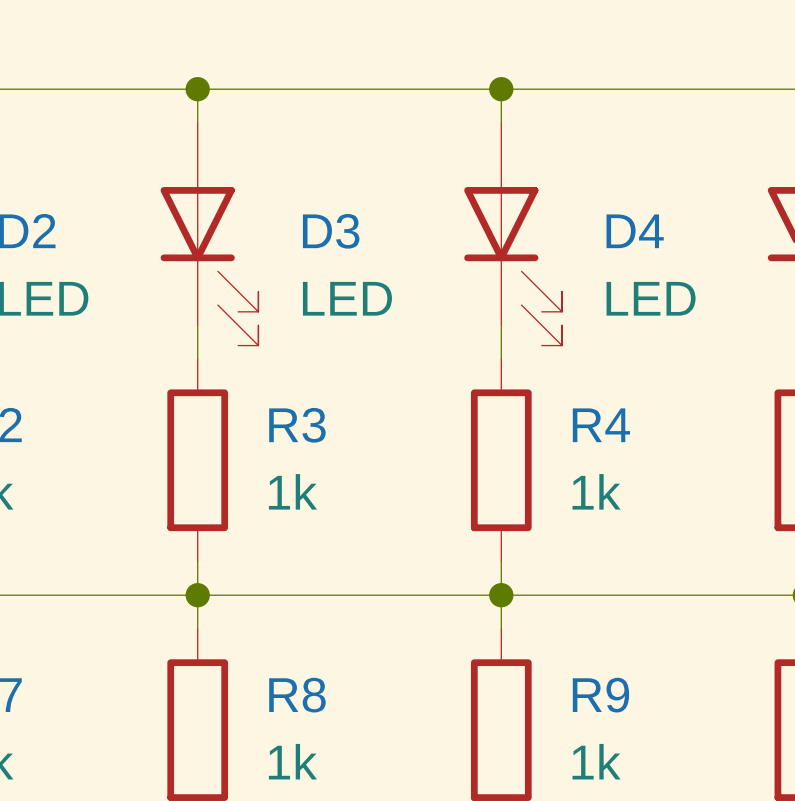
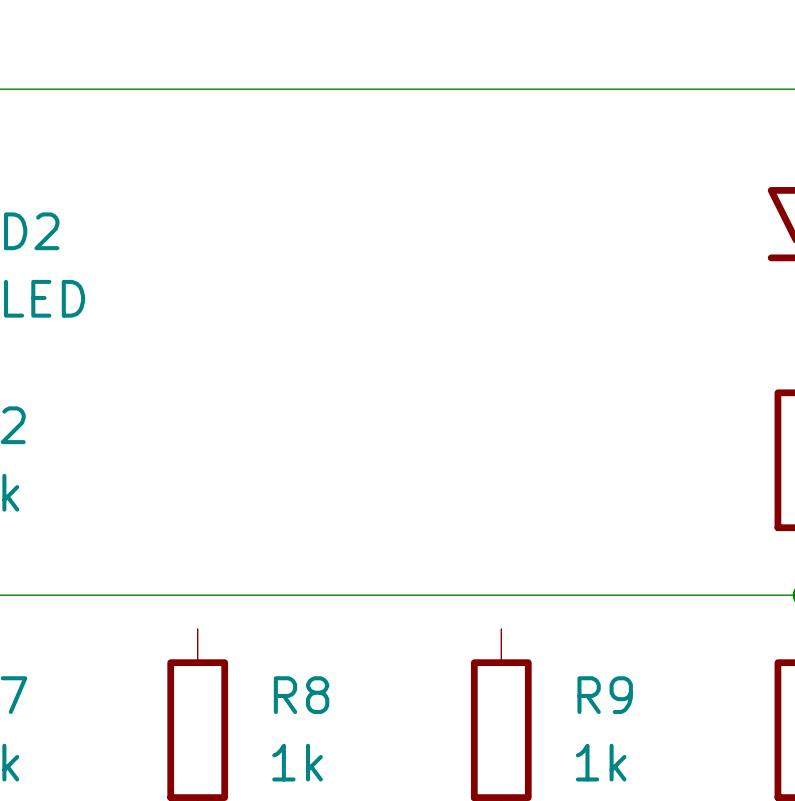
wire: (197, 89) (197, 122) -> none
junction: (197, 89) -> none
wire: (501, 89) (501, 122) -> none
junction: (501, 89) -> none
D3: LED (209, 234) -> none
D4: LED (513, 234) -> none
wire: (197, 325) (197, 359) -> none
wire: (501, 325) (501, 359) -> none
R3: 1k (197, 460) -> none
R4: 1k (501, 460) -> none
wire: (197, 561) (197, 628) -> none
wire: (501, 561) (501, 628) -> none
junction: (197, 595) -> none
junction: (501, 595) -> none

